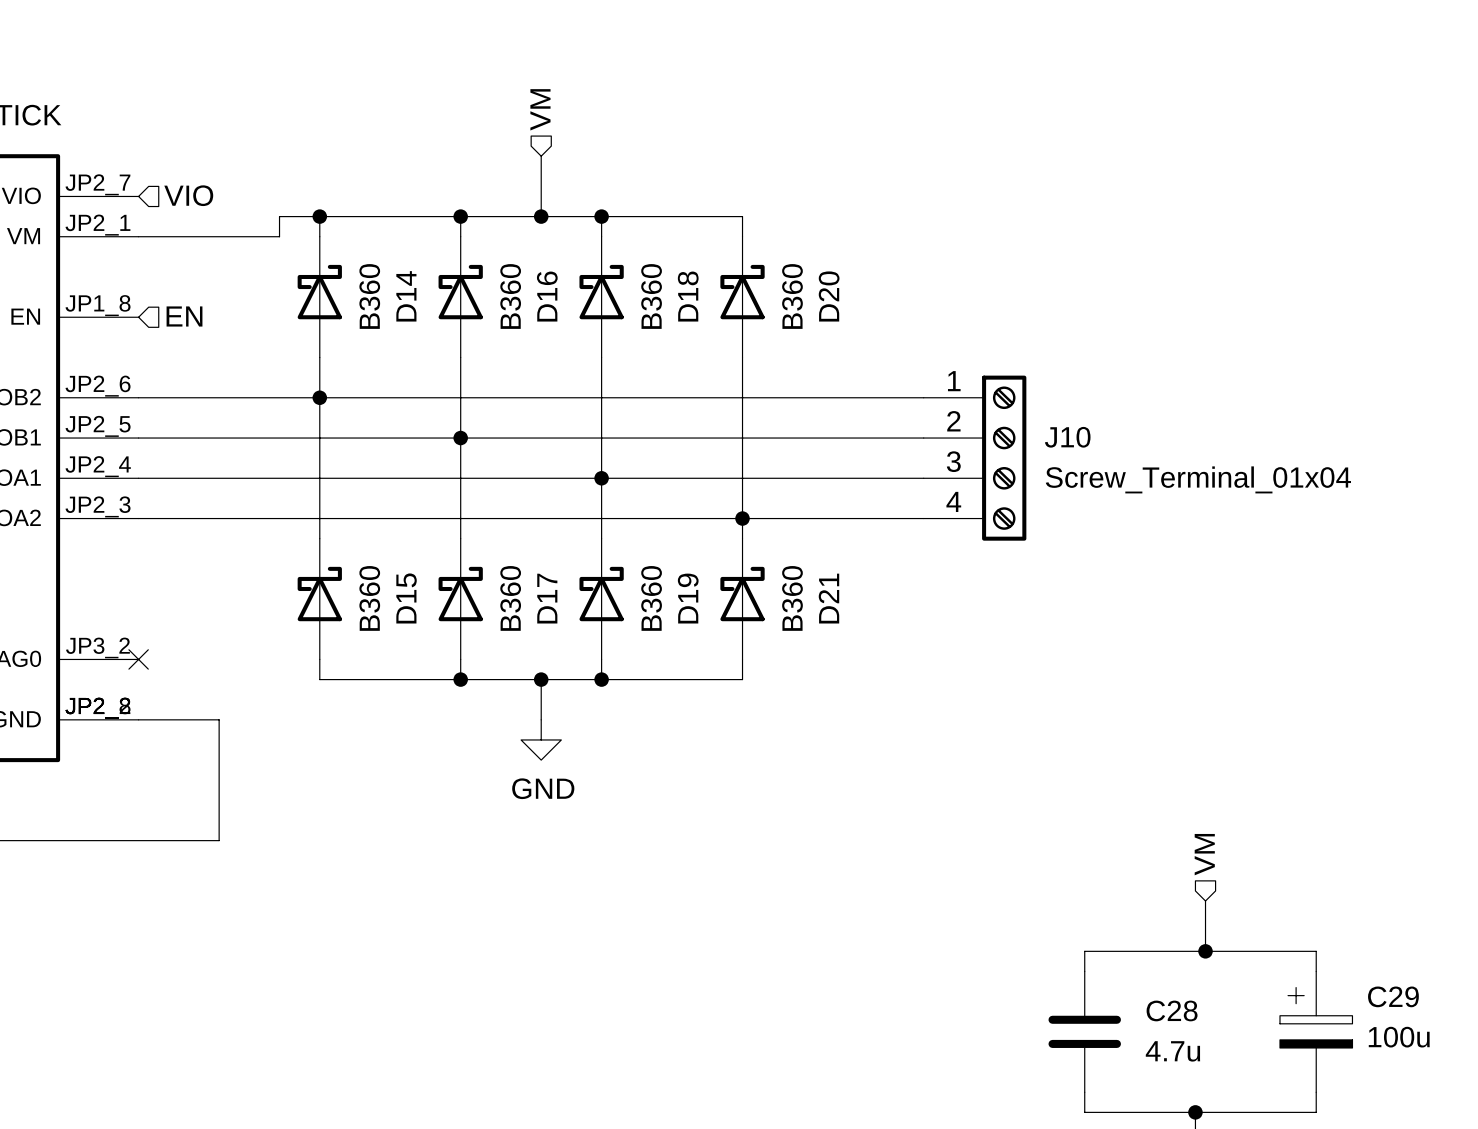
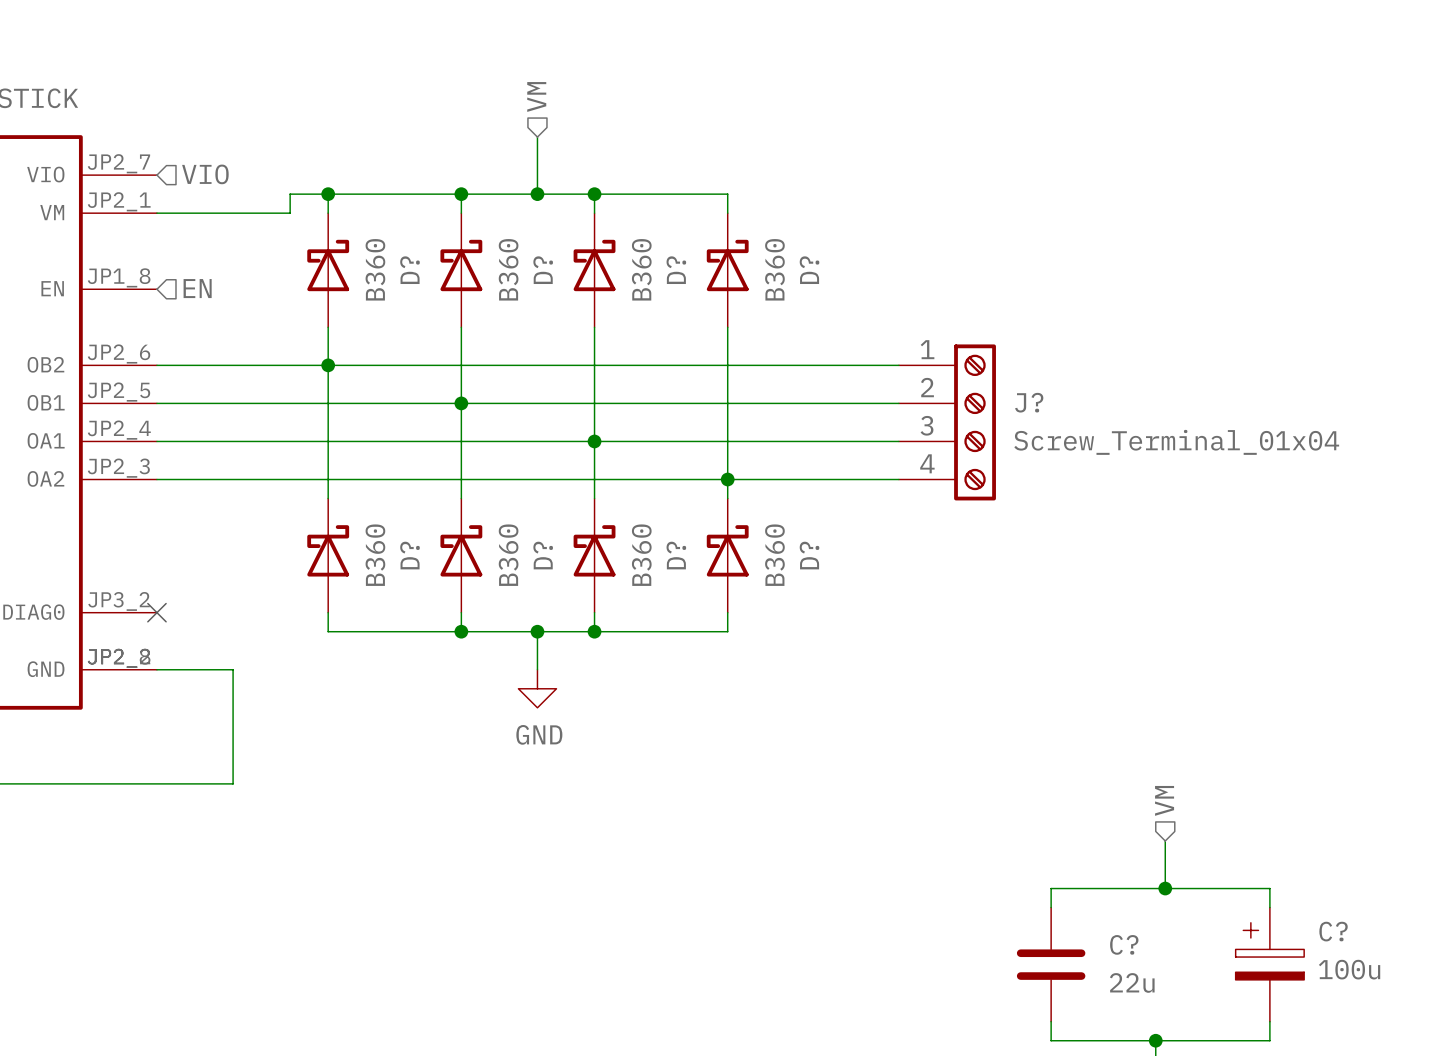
D14 name: D14 (406, 296) -> D? (410, 270)
D16 name: D16 (547, 296) -> D? (543, 270)
D18 name: D18 (688, 296) -> D? (676, 270)
D20 name: D20 (829, 296) -> D? (809, 270)
J10 name: J10 (1067, 437) -> J? (1029, 402)
D15 name: D15 (406, 598) -> D? (410, 555)
D17 name: D17 (547, 598) -> D? (543, 555)
D19 name: D19 (688, 598) -> D? (676, 555)
D21 name: D21 (828, 598) -> D? (809, 555)
C29 name: C29 (1393, 996) -> C? (1333, 931)
C28 name: C28 (1172, 1010) -> C? (1124, 944)
C28 value: 4.7u (1172, 1051) -> 22u (1132, 982)

